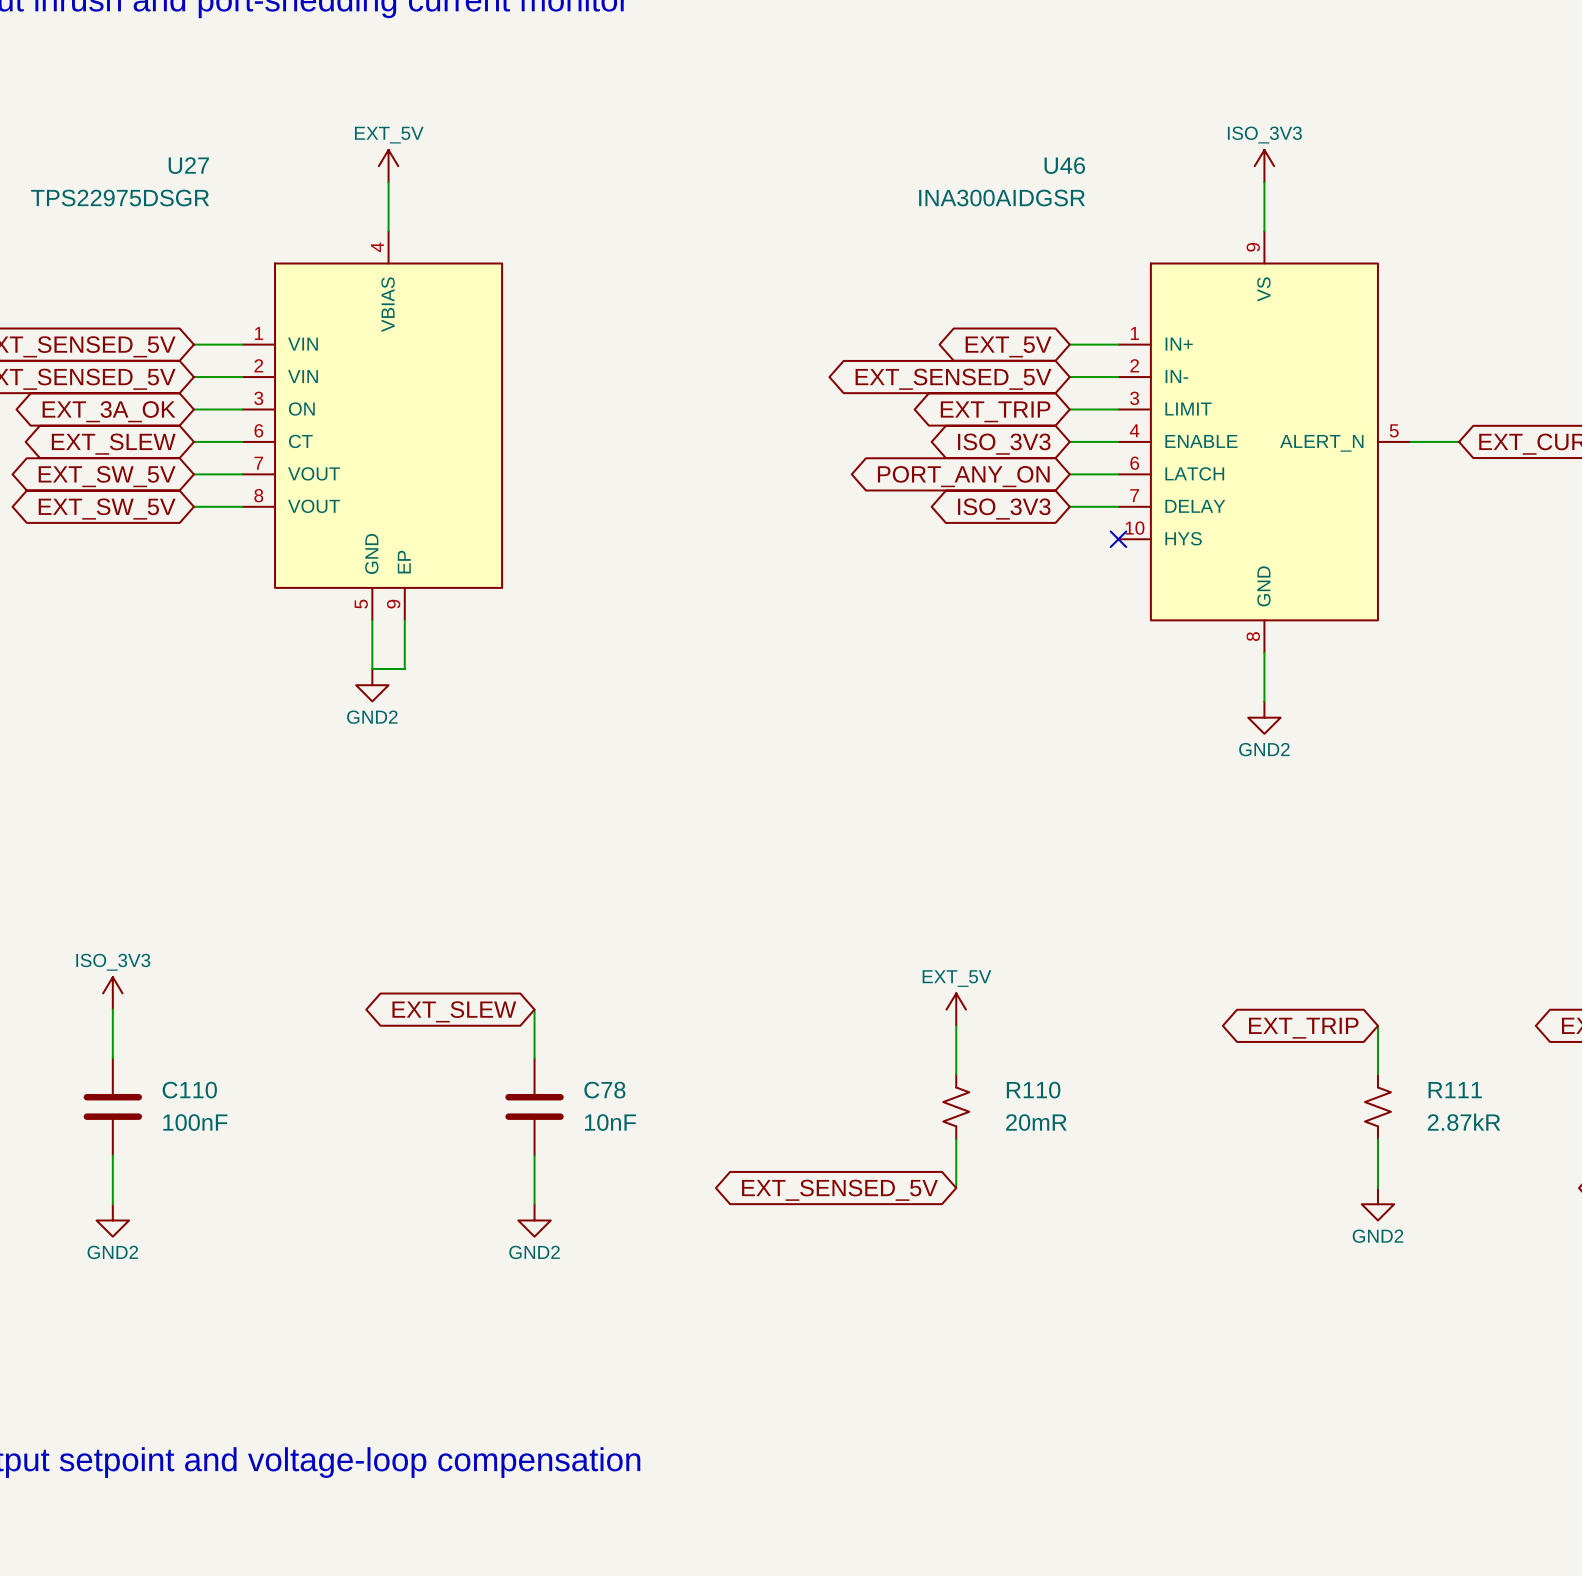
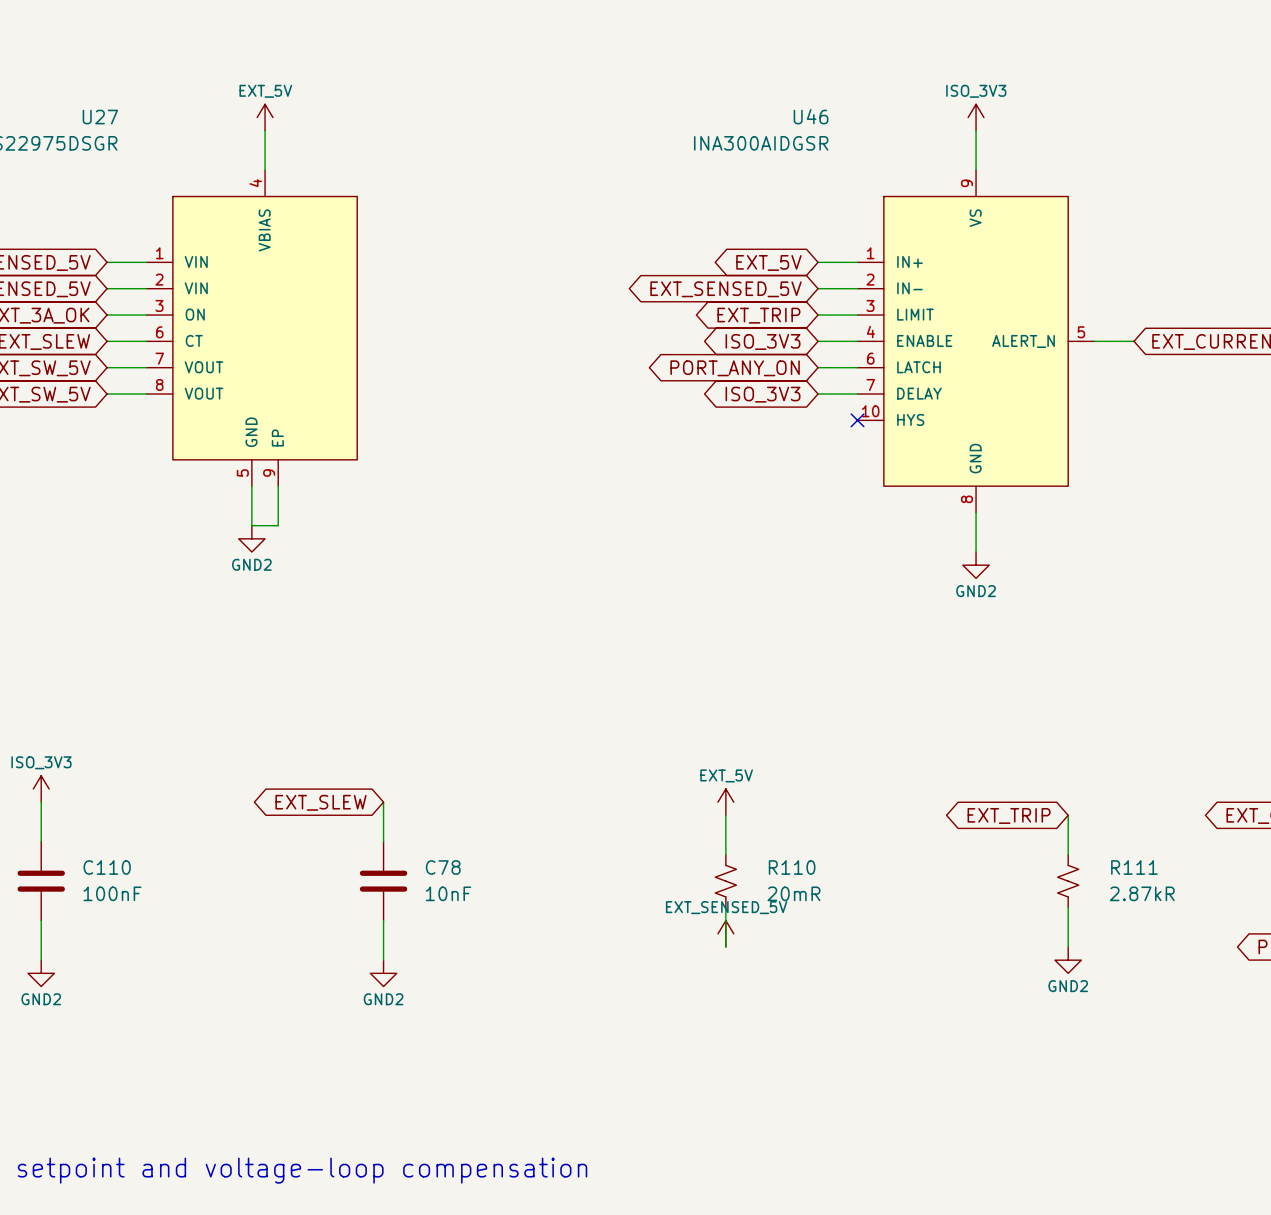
power symbol: none -> EXT_SENSED_5V (725, 933)
global label: EXT_SENSED_5V (839, 1190) -> none

